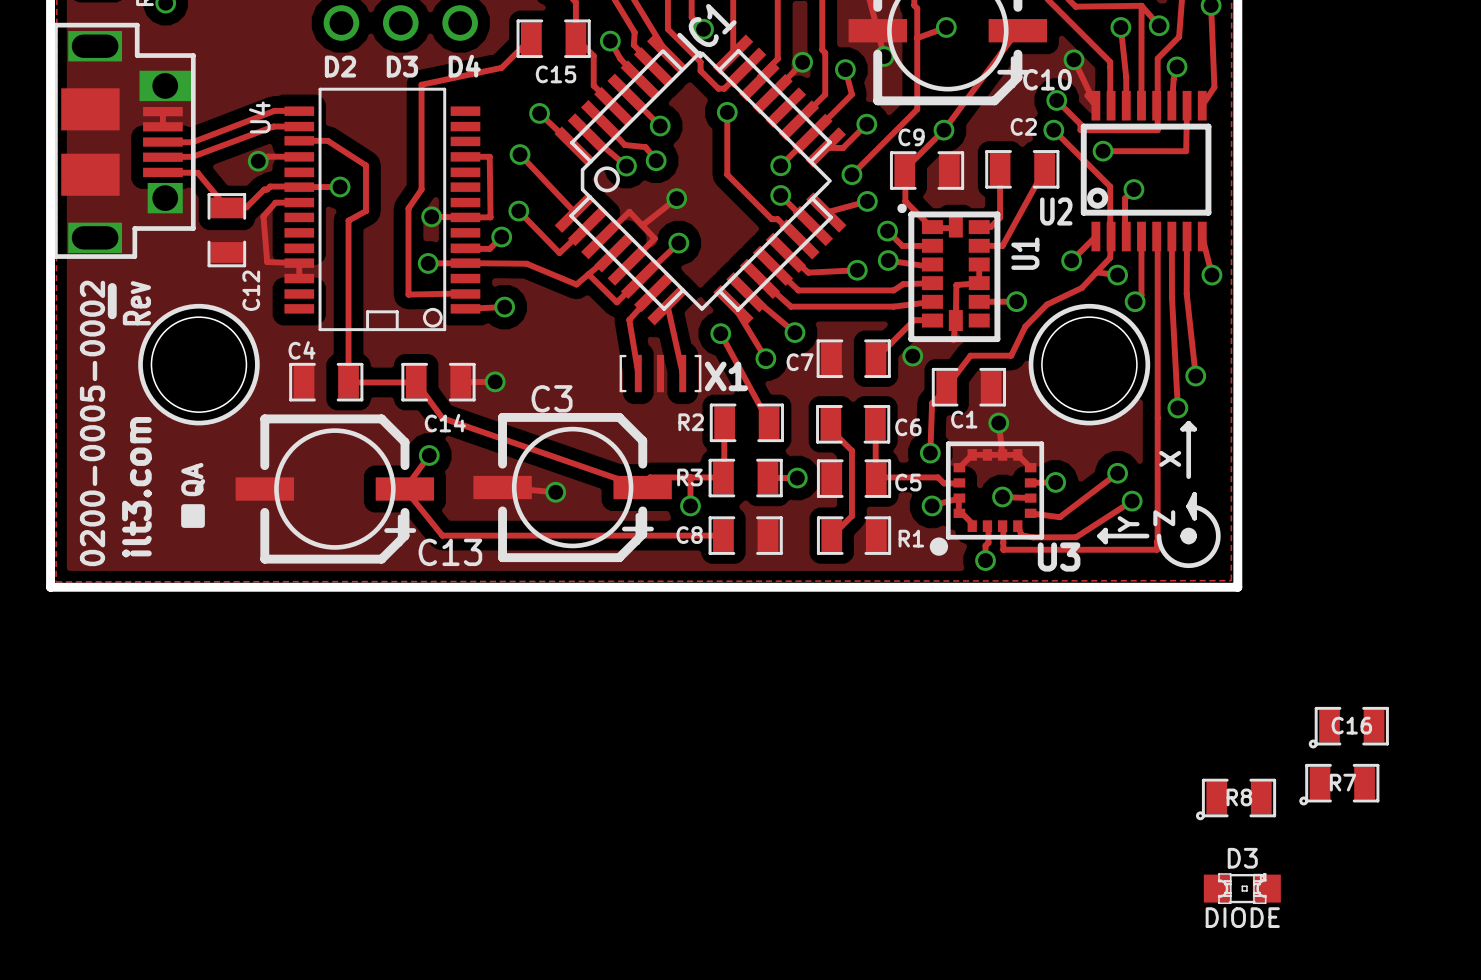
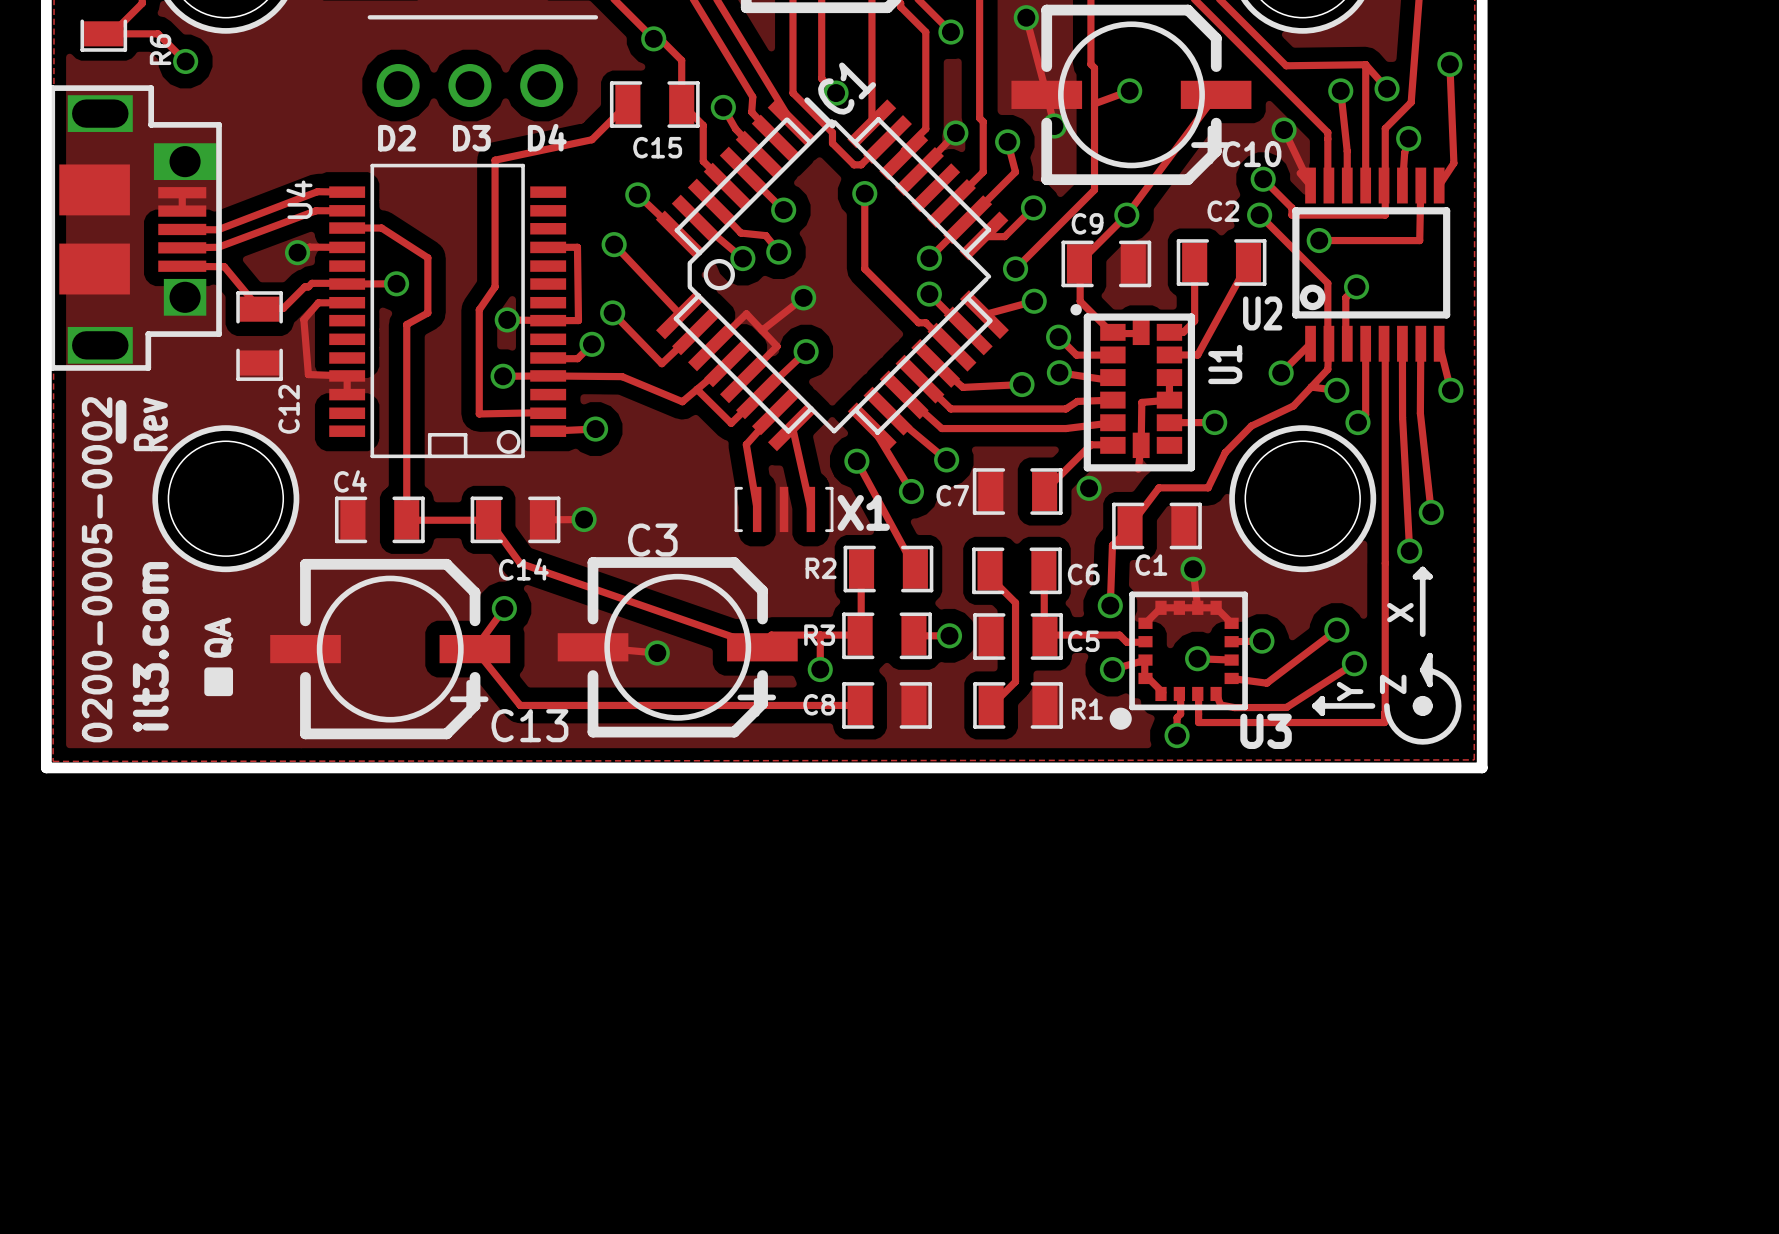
C16: (1348, 727) -> none
R7: (1339, 784) -> none
R8: (1236, 799) -> none
D3: DIODE (1242, 888) -> none

